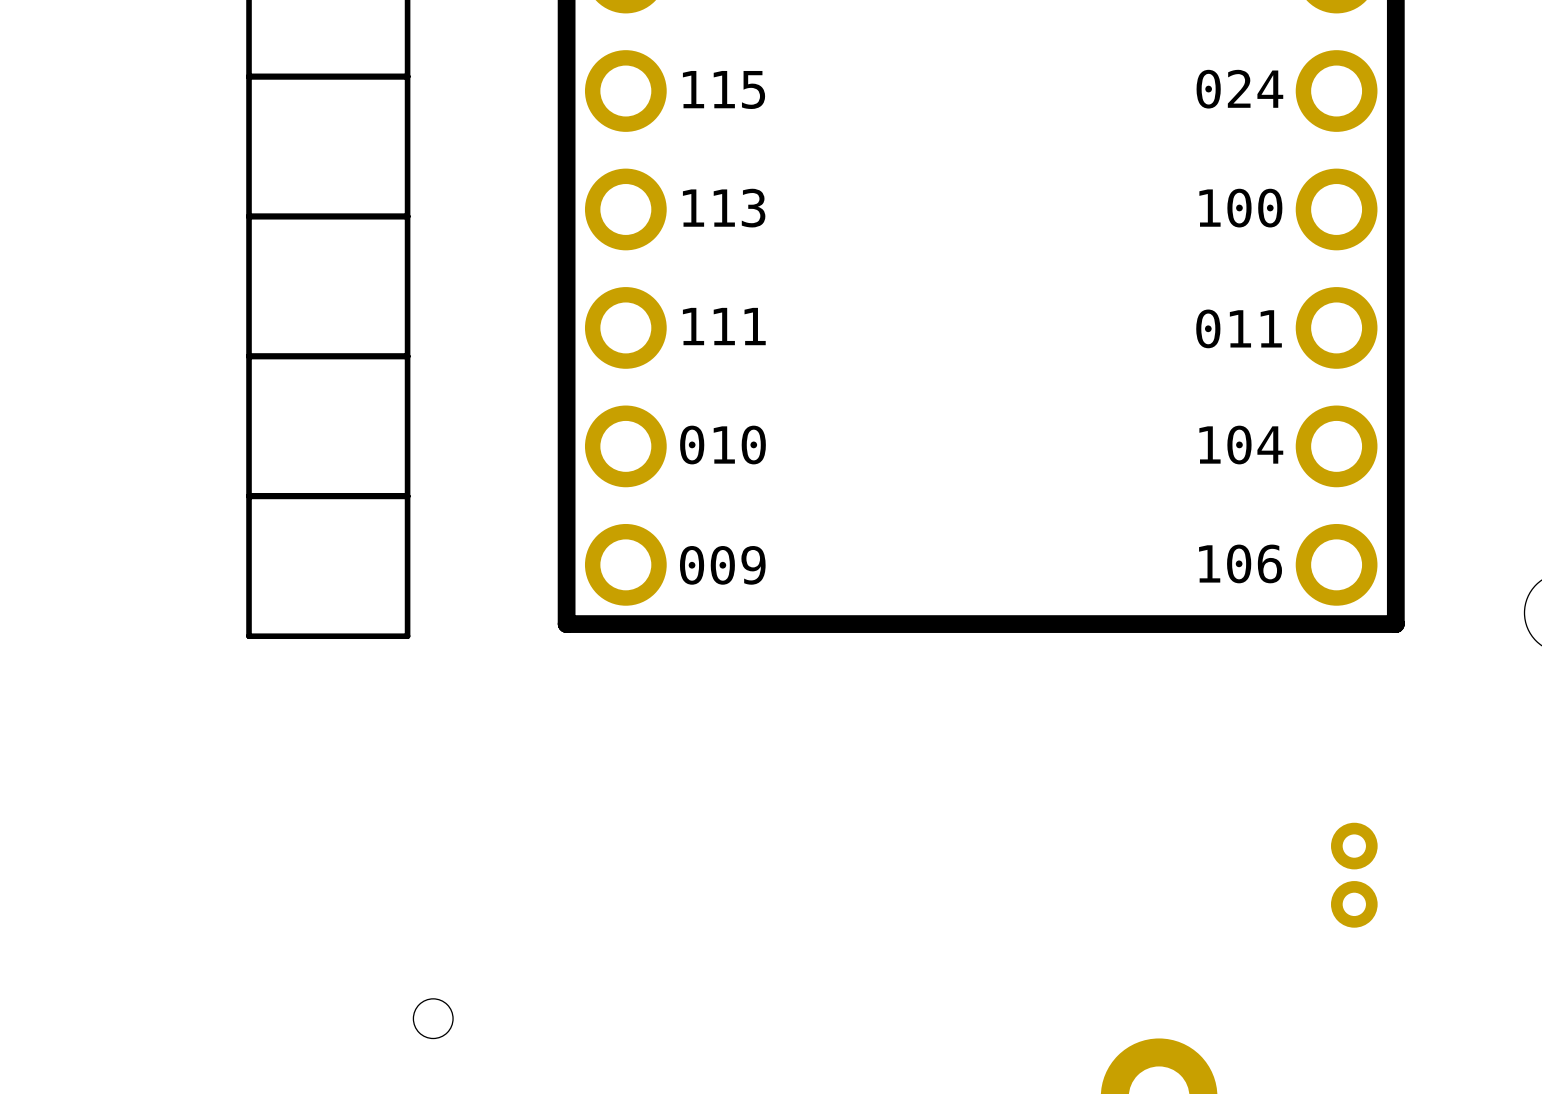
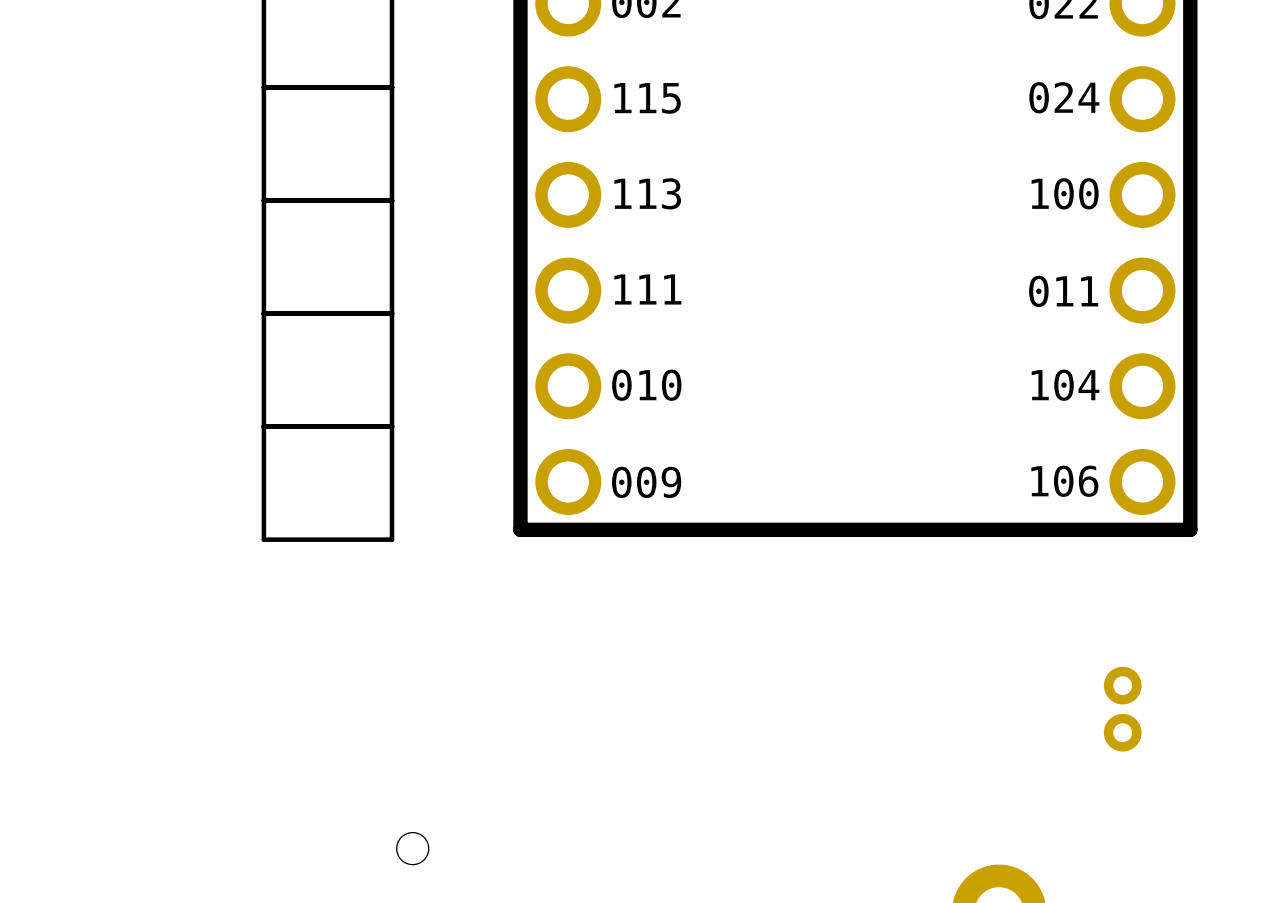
part position: (1354, 875) -> (1122, 709)

